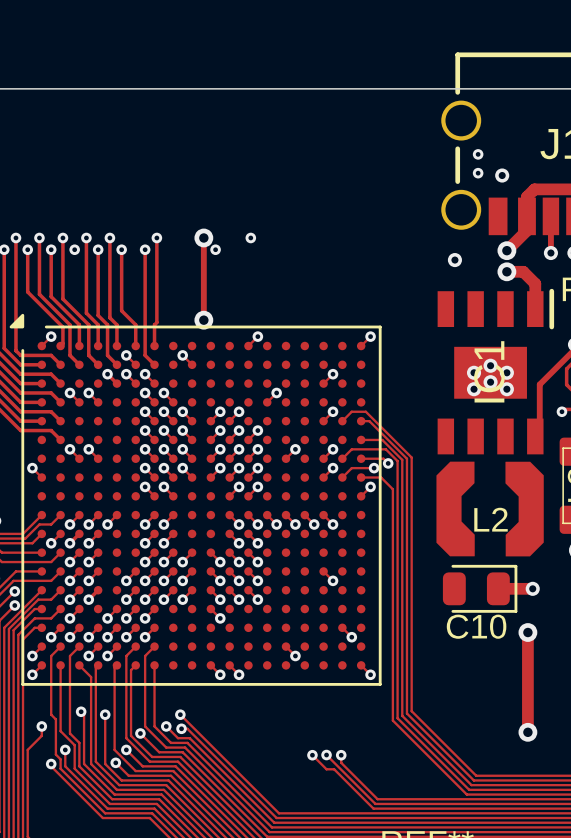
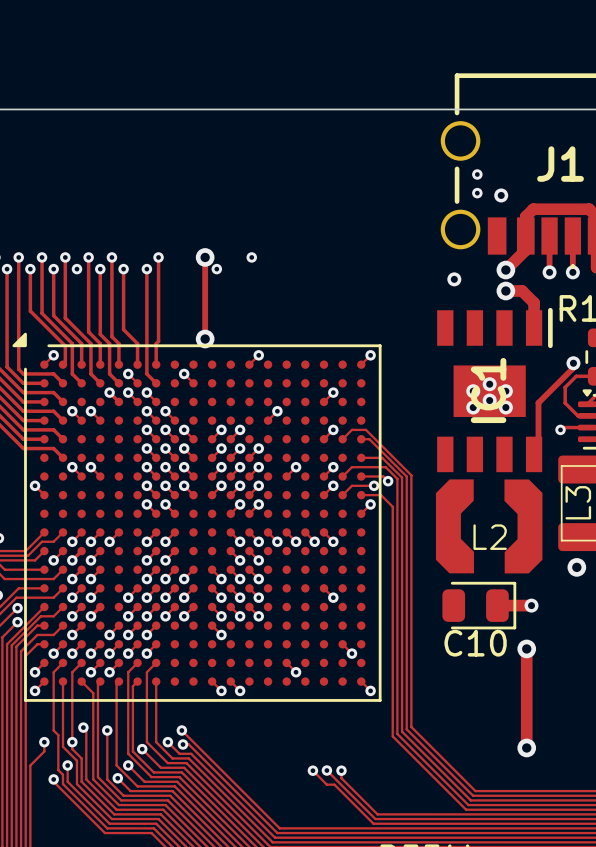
via: none -> (72, 742)

